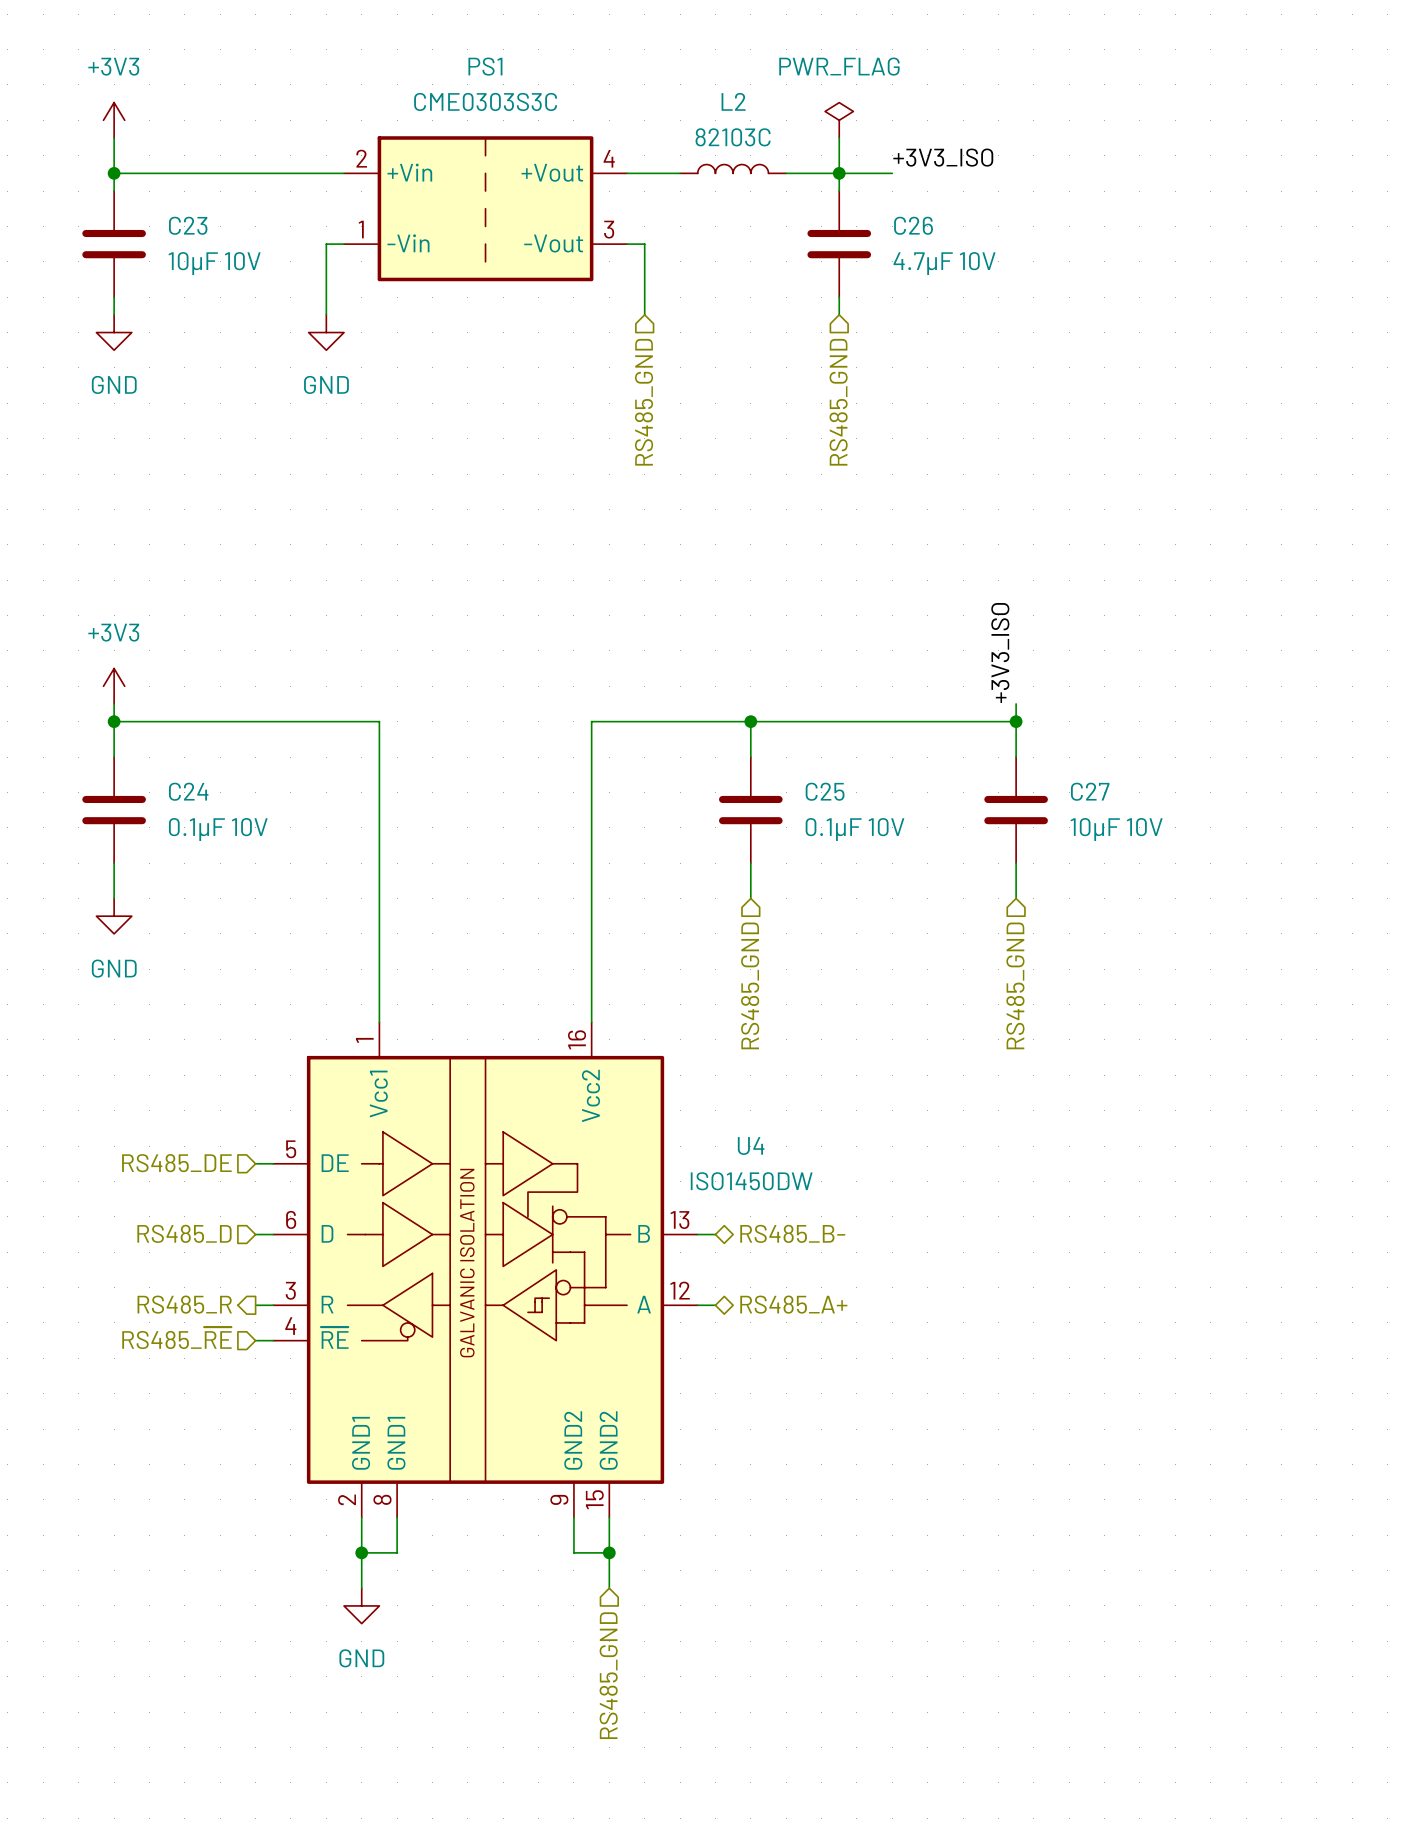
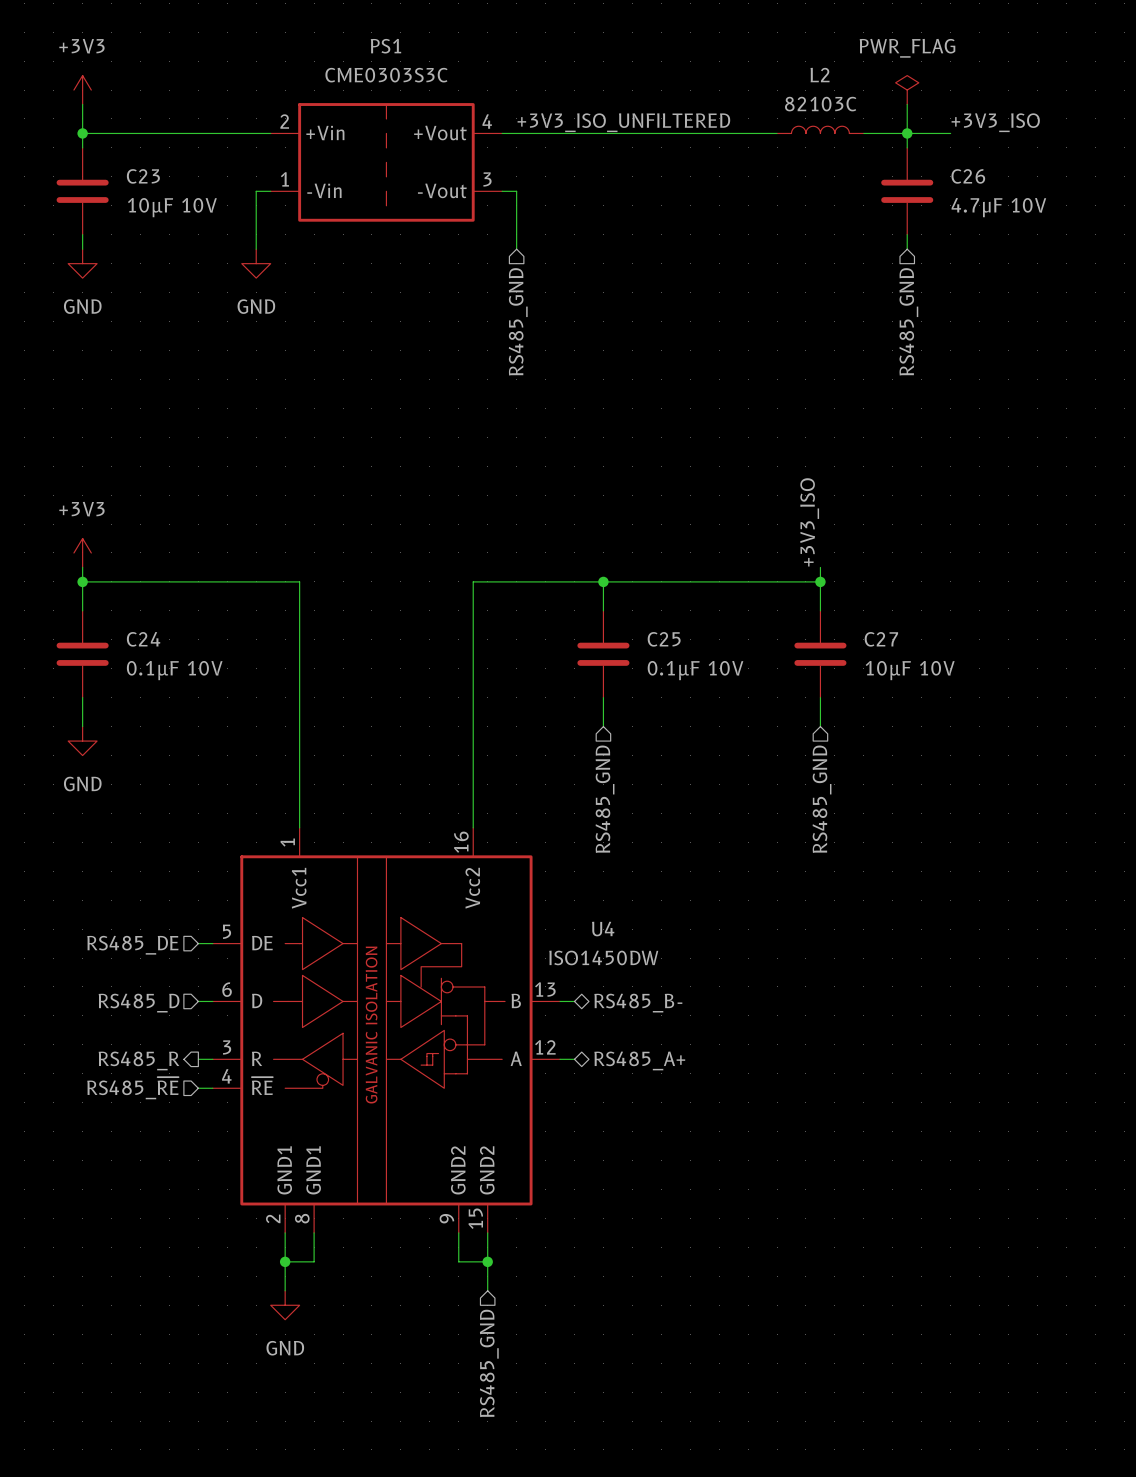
power symbol position: PWR_FLAG (839, 120) -> PWR_FLAG (907, 90)
wire: (839, 137) (839, 191) -> (907, 104) (907, 147)
label: none -> +3V3_ISO_UNFILTERED (623, 122)
label position: +3V3_ISO (943, 157) -> +3V3_ISO (995, 122)
L2 position: (733, 168) -> (820, 129)
wire: none -> (545, 133) (632, 133)
junction: (839, 173) -> none
wire: none -> (719, 133) (777, 133)
wire: none -> (863, 133) (950, 133)
junction: none -> (907, 133)
C26 position: (839, 244) -> (907, 191)
wire: (839, 297) (839, 314) -> (907, 234) (907, 249)
hierarchical label position: RS485_GND (838, 402) -> RS485_GND (908, 321)

